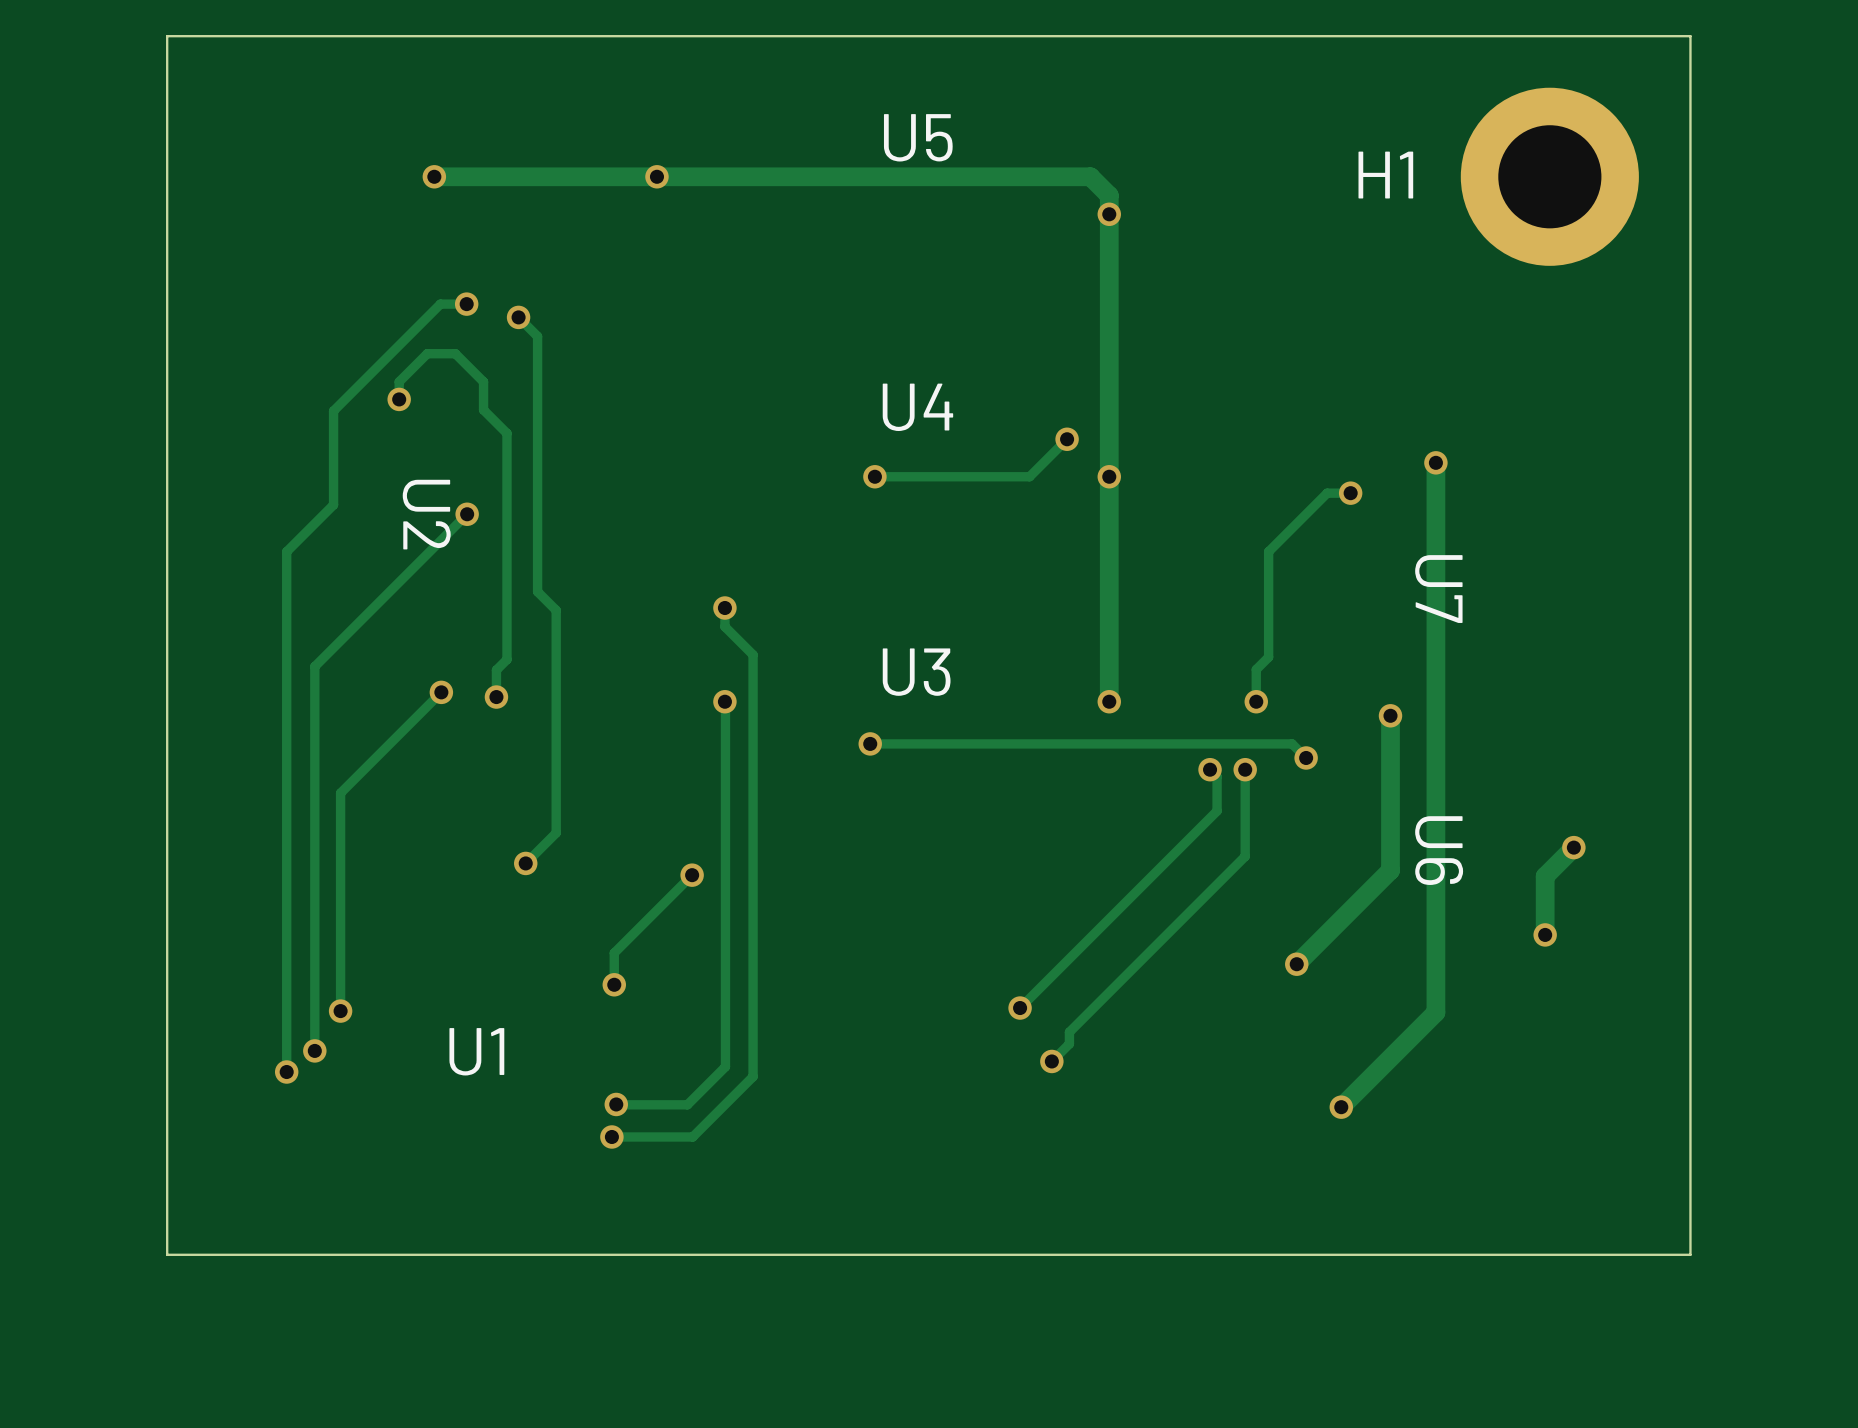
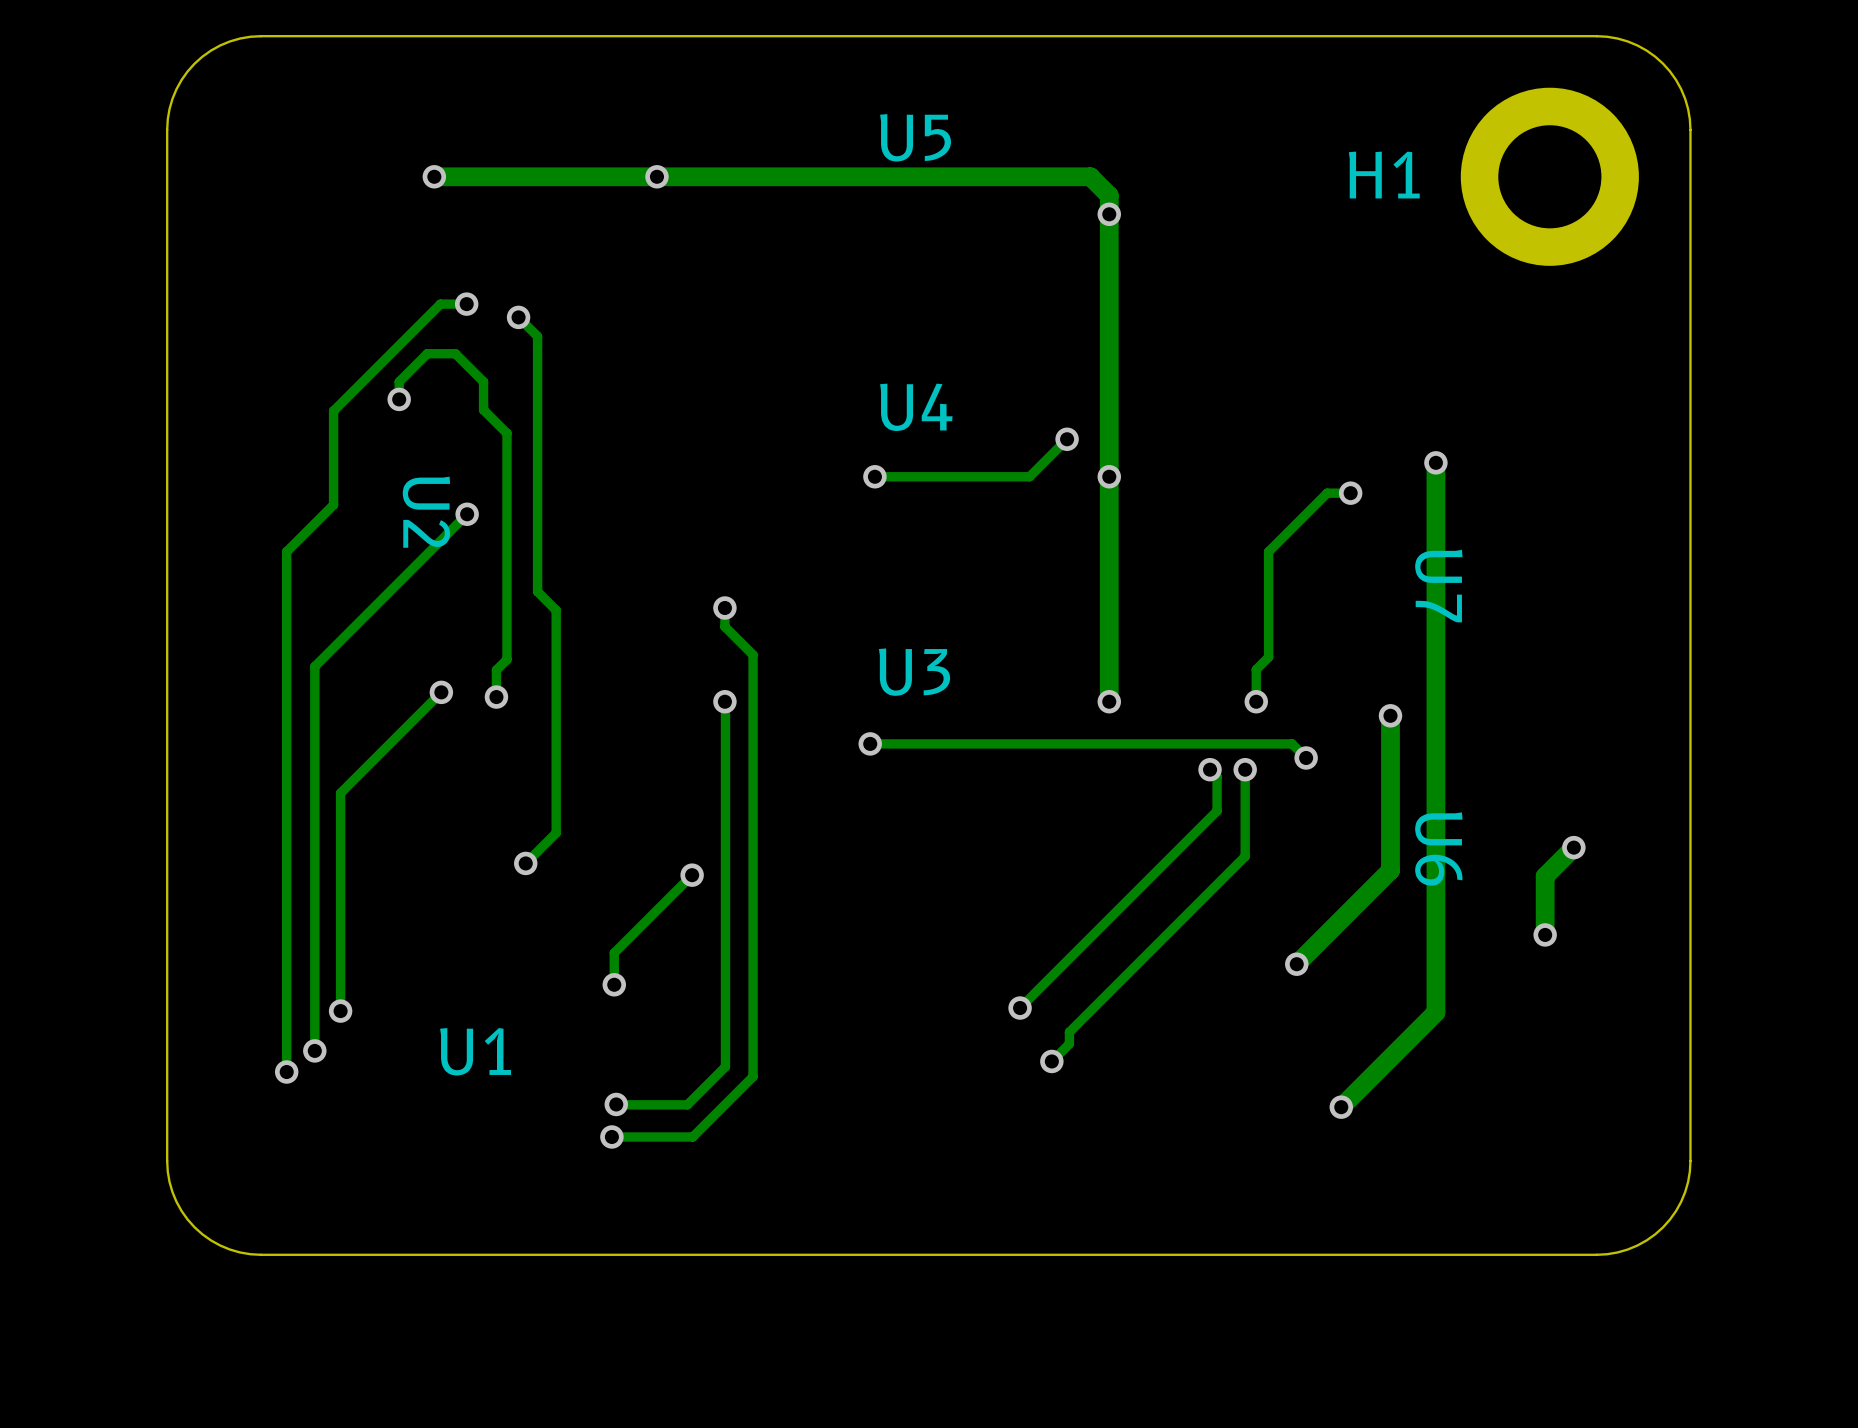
board edge: (260, 36) (167, 36) (167, 129) -> (260, 36) (240, 38) (220, 45) (194, 63) (176, 89) (169, 109) (167, 129)
board edge: (1596, 36) (1690, 36) (1690, 129) -> (1596, 36) (1627, 41) (1646, 50) (1663, 63) (1676, 80) (1685, 98) (1690, 129)
board edge: (167, 1161) (167, 1254) (260, 1254) -> (167, 1161) (172, 1192) (181, 1210) (194, 1227) (220, 1245) (240, 1252) (260, 1254)
board edge: (1690, 1161) (1690, 1254) (1596, 1254) -> (1690, 1161) (1685, 1192) (1676, 1210) (1663, 1227) (1646, 1240) (1627, 1249) (1596, 1254)

